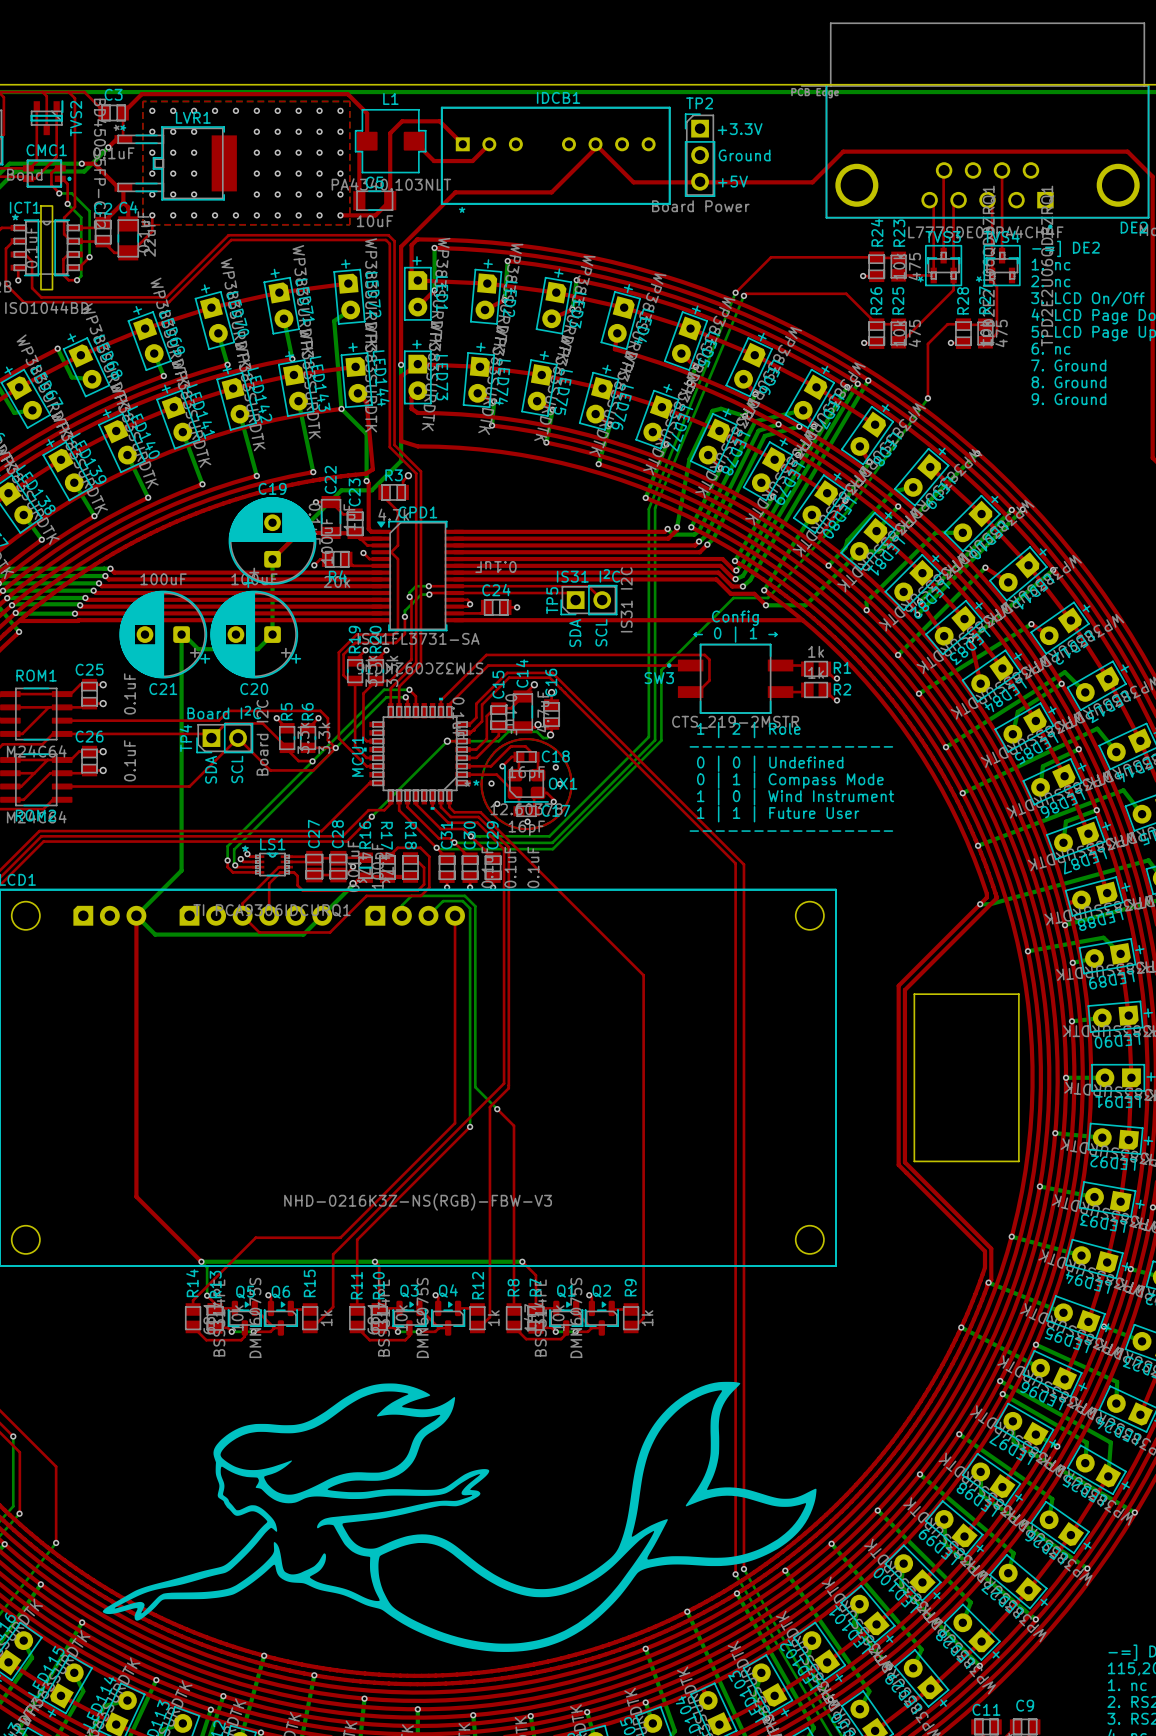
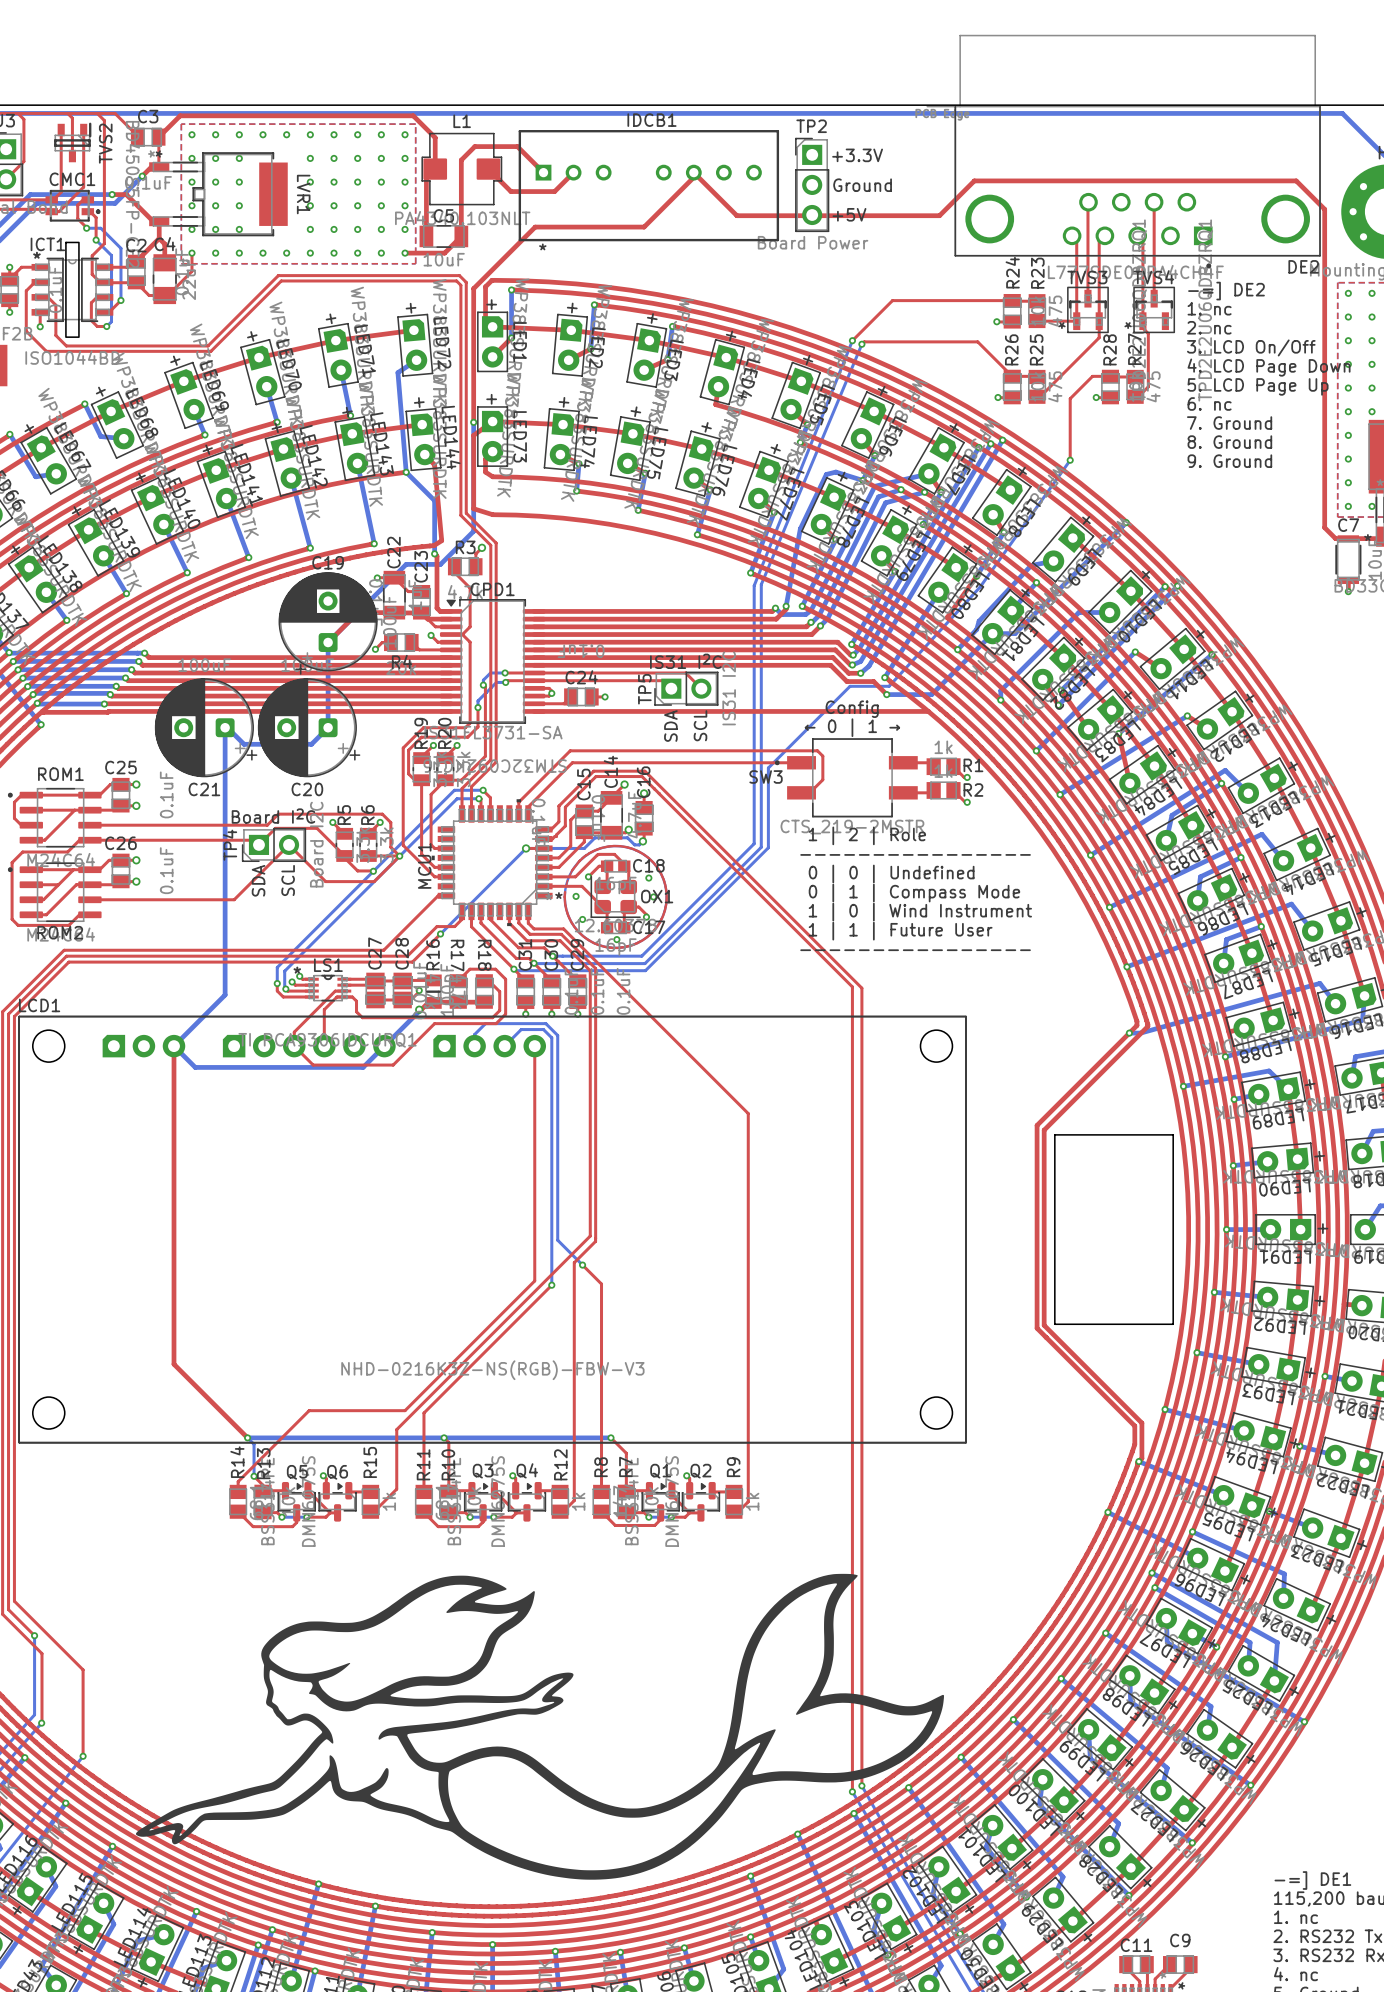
LVR1 name rotation: 0° (193, 117) -> 90° clockwise (303, 194)
LVR1 name position: LVR1 (193, 117) -> LVR1 (303, 194)

